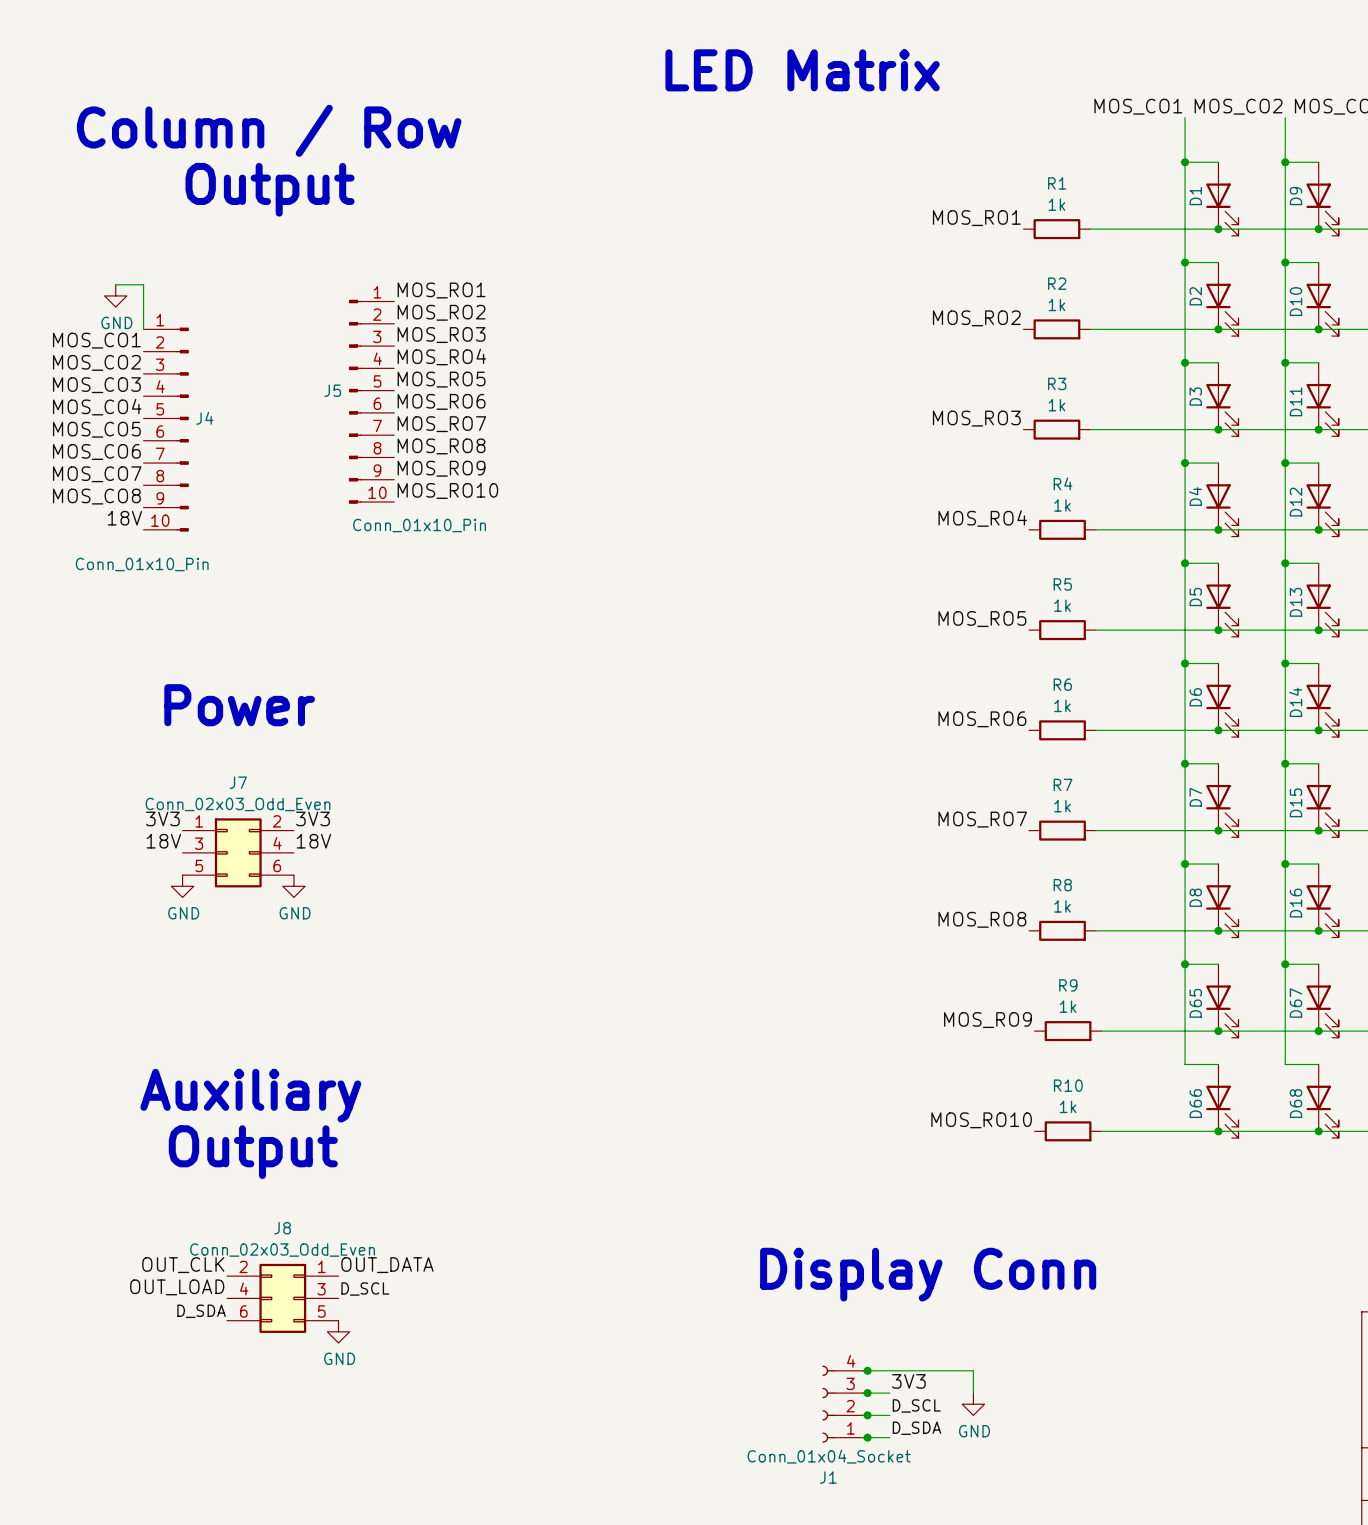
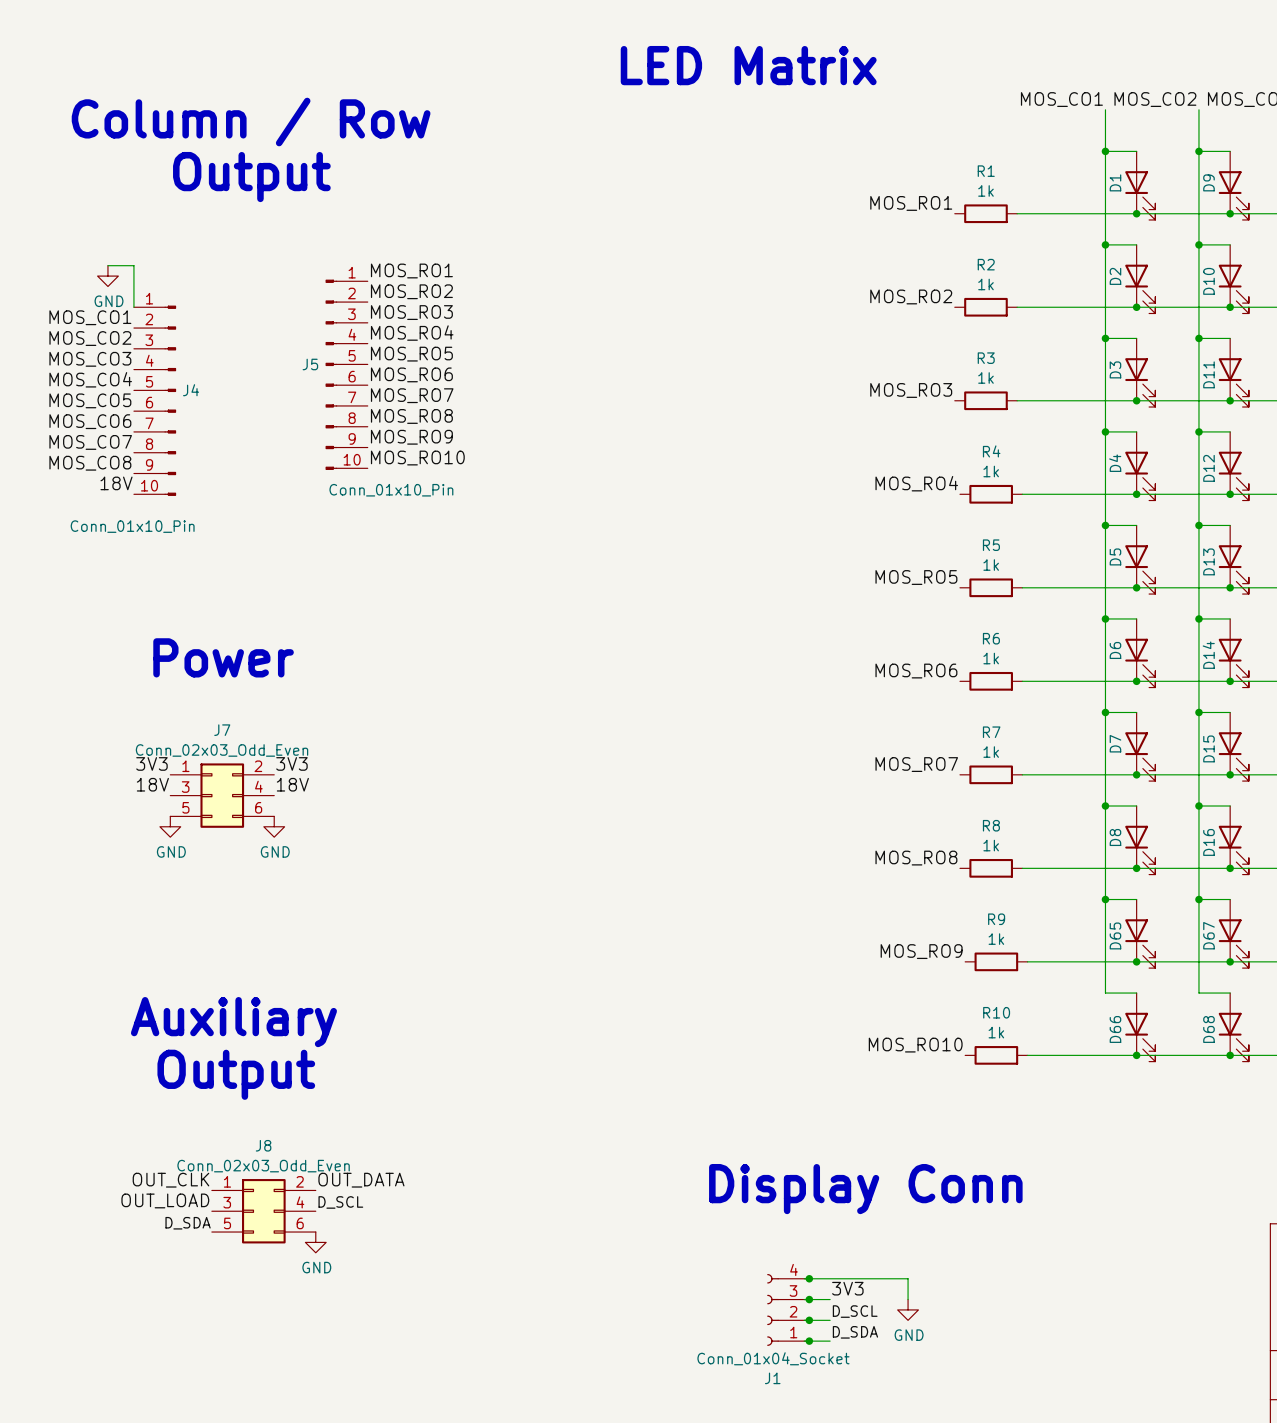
J8 flip: as is (282, 1298) -> left-right (263, 1211)

